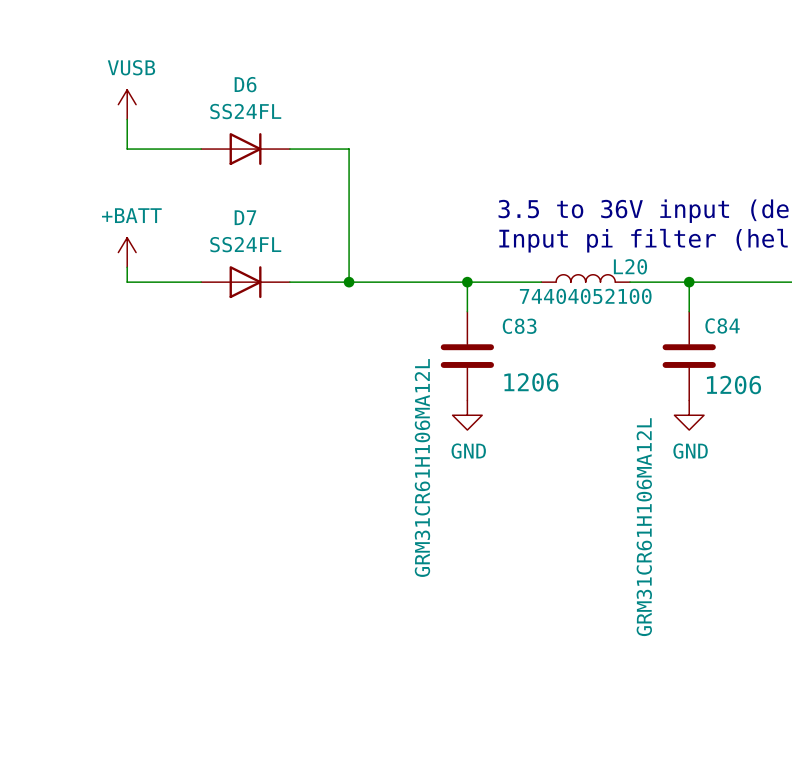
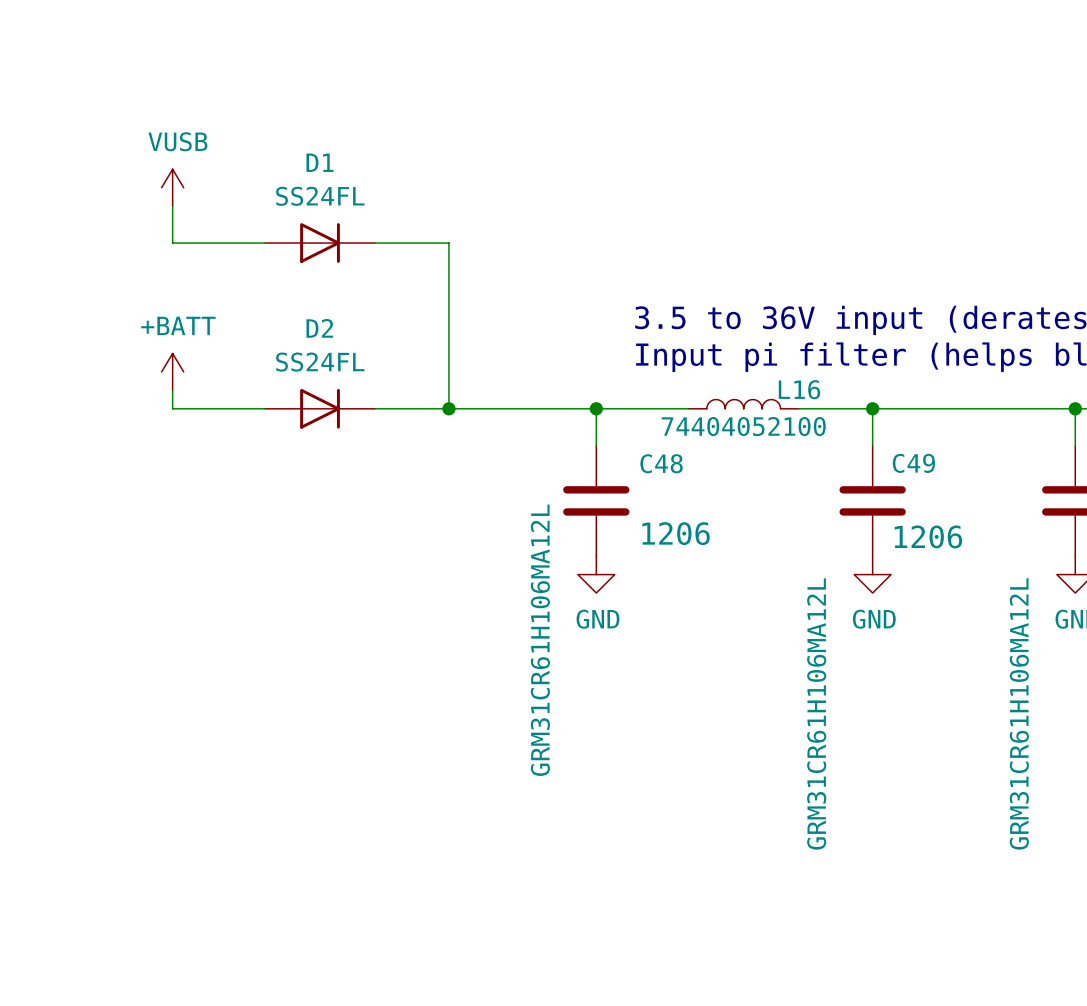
D6 name: D6 (245, 84) -> D1 (319, 162)
D7 name: D7 (245, 217) -> D2 (319, 328)
L20 name: L20 (630, 266) -> L16 (799, 389)
C84 name: C84 (722, 325) -> C49 (913, 463)
C83 name: C83 (519, 326) -> C48 (661, 463)

